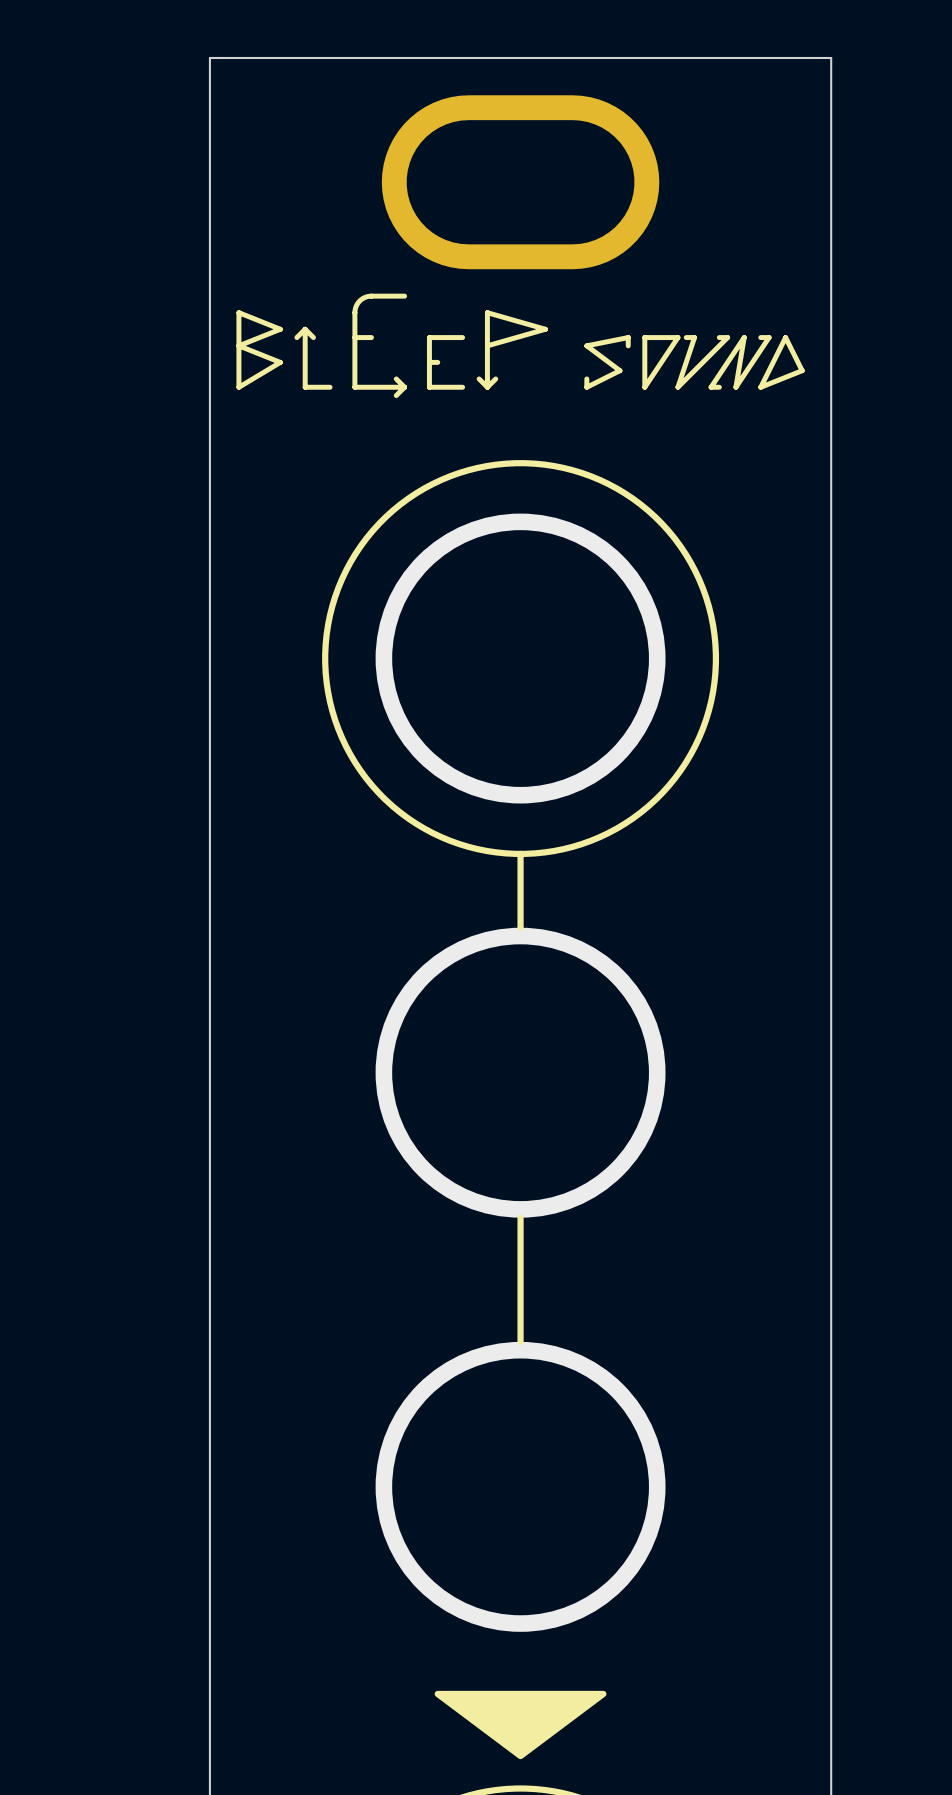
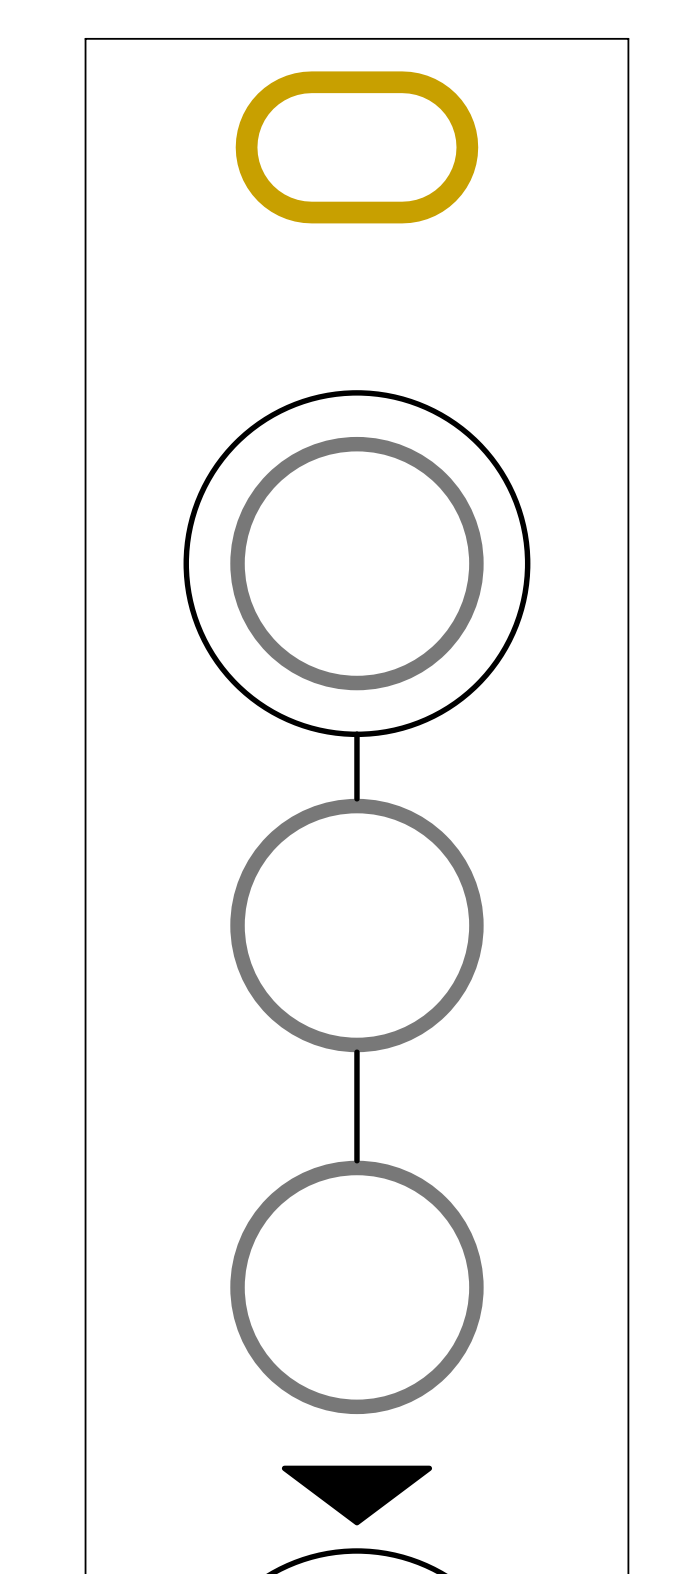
line: (404, 296) (367, 296) (361, 299) (356, 305) (354, 387) (404, 387) -> none
line: (238, 312) (238, 387) (280, 362) (238, 345) (280, 329) (238, 312) -> none
line: (305, 329) (305, 387) (330, 387) -> none
line: (305, 329) (296, 337) -> none
line: (305, 329) (313, 337) -> none
line: (354, 337) (371, 337) -> none
line: (462, 337) (429, 337) (429, 387) (462, 387) -> none
line: (644, 337) (677, 337) (644, 387) (644, 337) -> none
line: (686, 337) (694, 337) (677, 387) (727, 337) (719, 337) -> none
line: (760, 337) (769, 337) (735, 387) (744, 337) (711, 387) (719, 387) -> none
line: (785, 337) (802, 370) (760, 387) (785, 337) -> none
line: (487, 345) (545, 329) (487, 312) (487, 387) -> none
line: (628, 345) (628, 337) (586, 345) (619, 370) (586, 387) (586, 378) -> none
line: (429, 362) (437, 362) -> none
line: (396, 378) (404, 387) -> none
line: (479, 378) (487, 387) -> none
line: (495, 378) (487, 387) -> none
line: (404, 387) (396, 395) -> none

